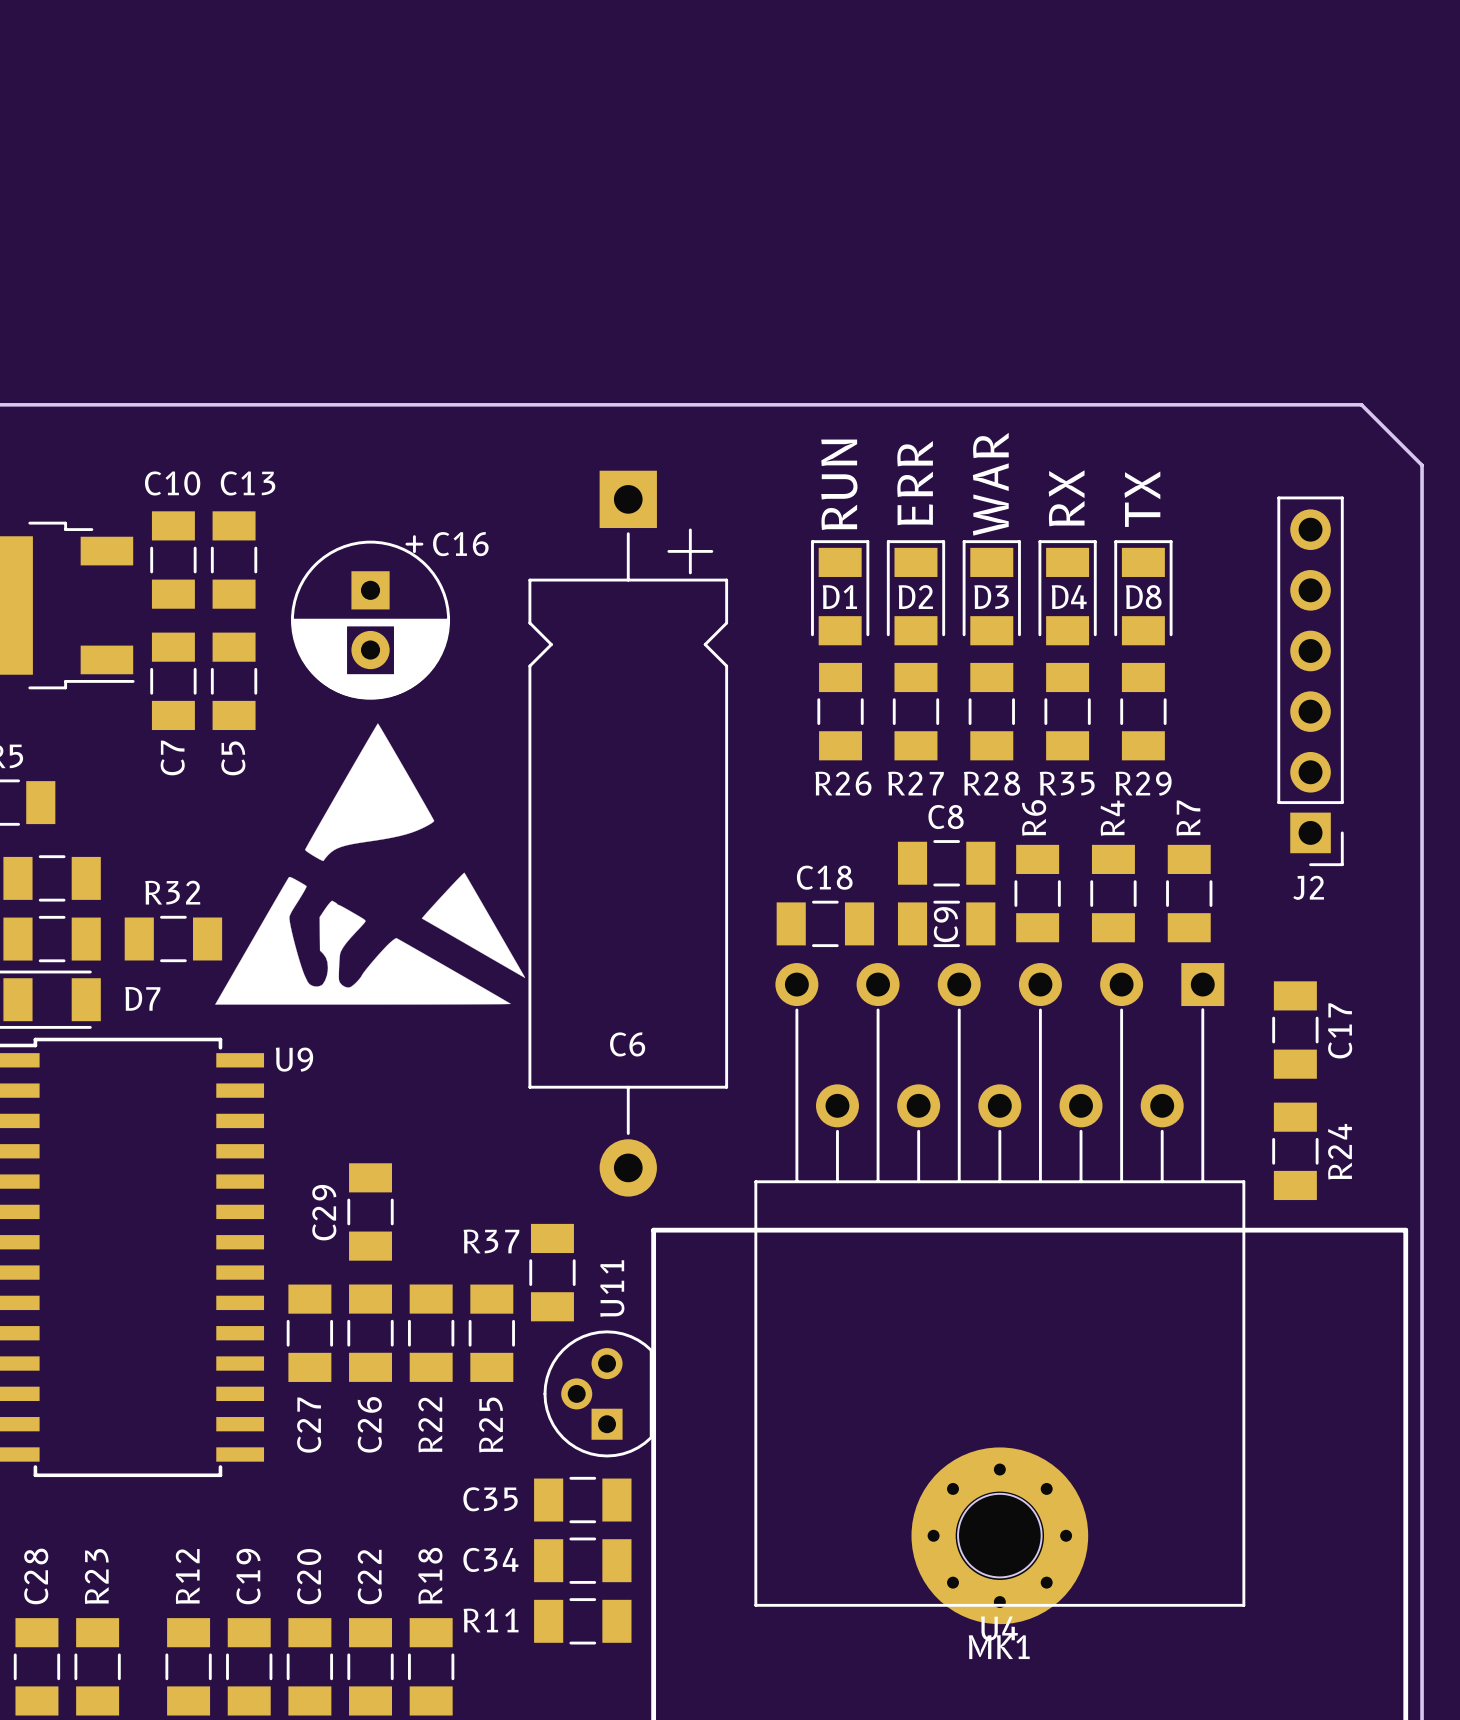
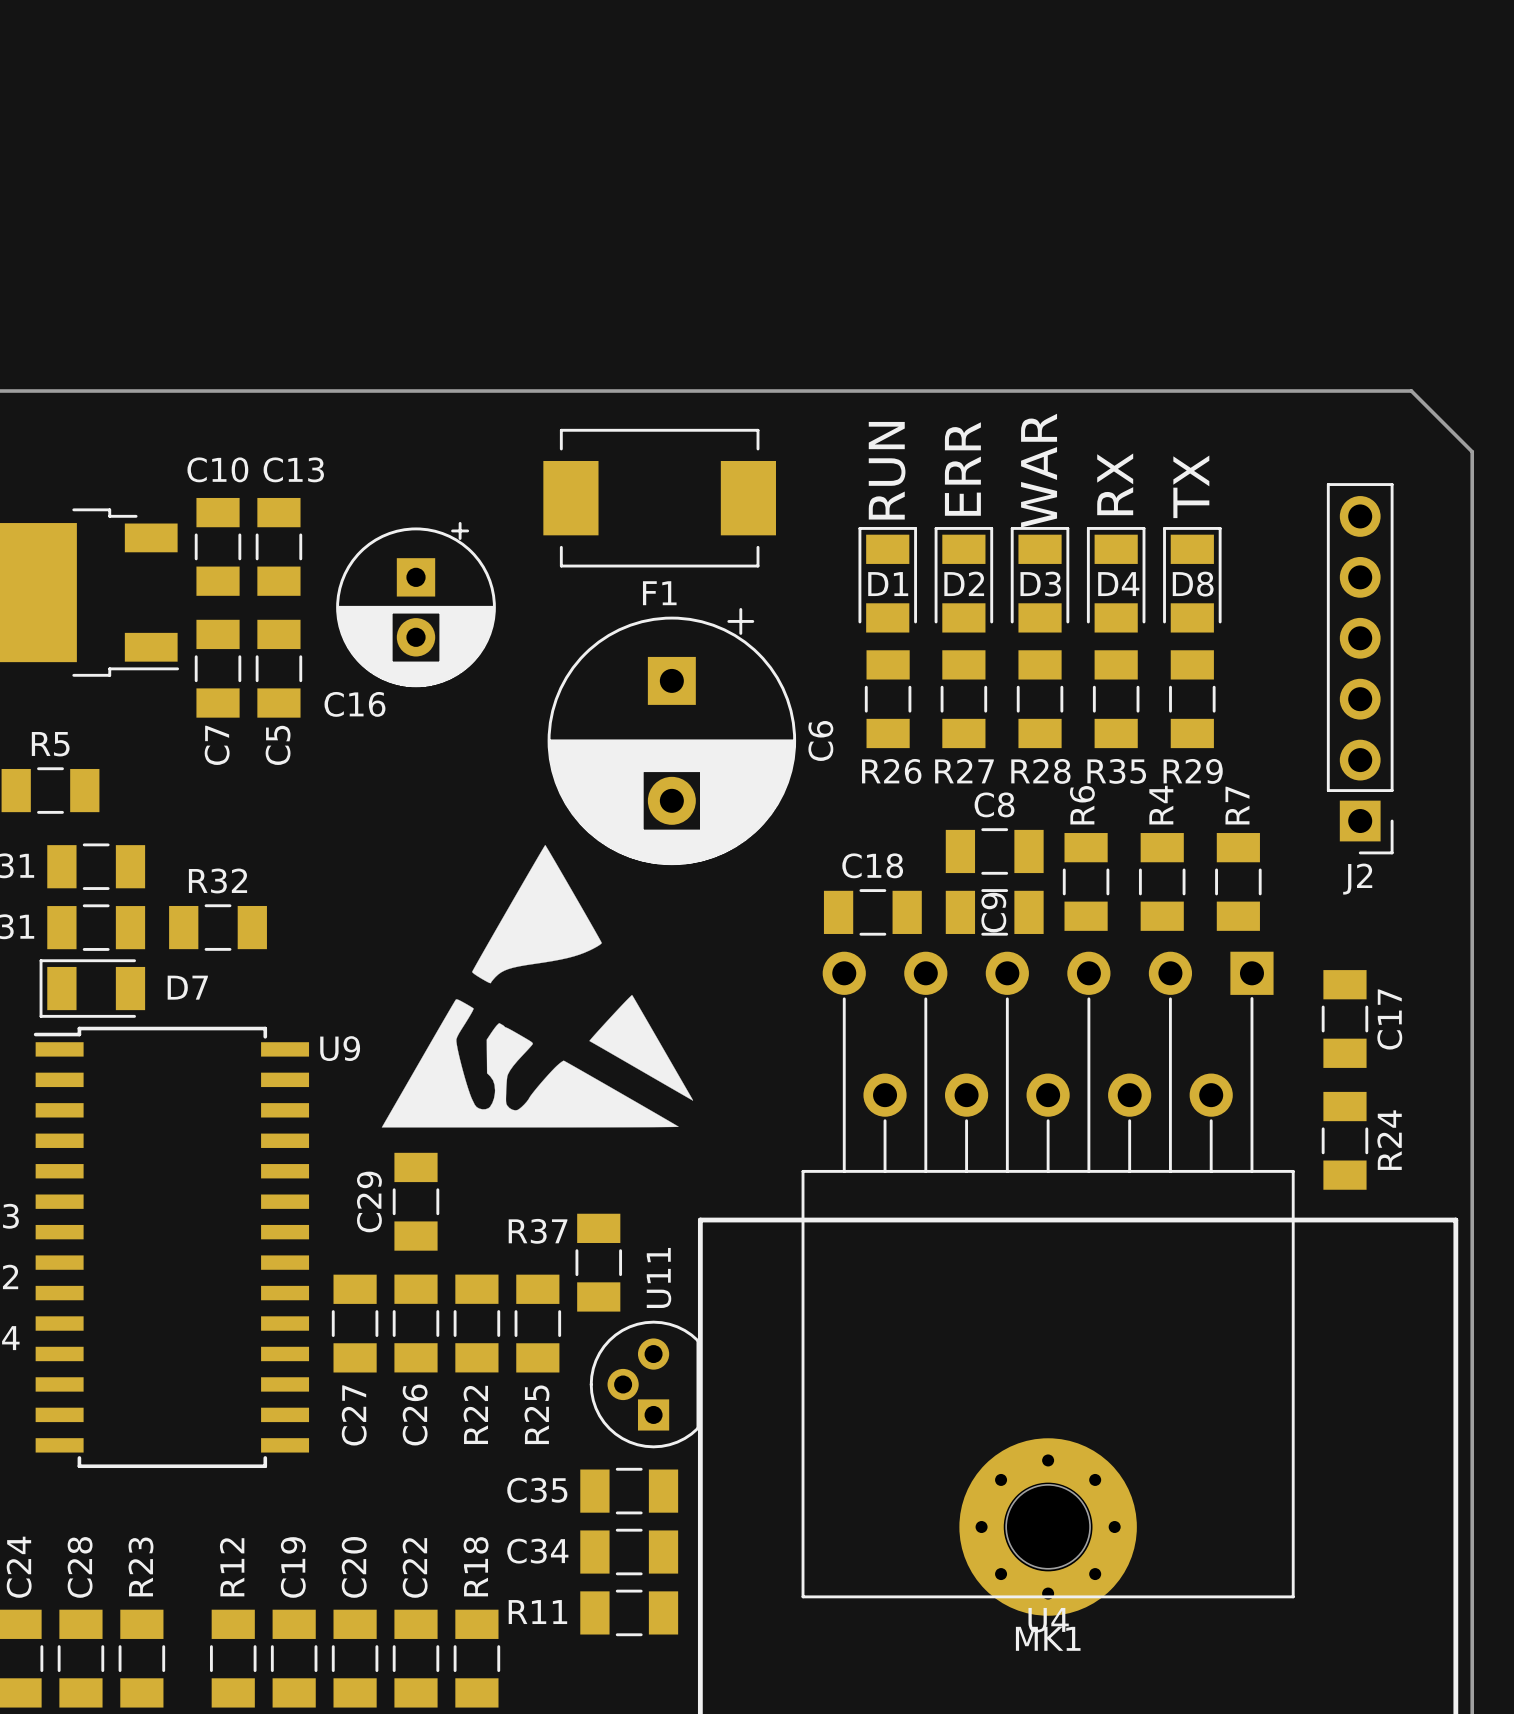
C6 footprint: [528, 470, 729, 1197] -> [547, 608, 797, 866]
F1: none -> (659, 498)
C16 name position: C16 (460, 544) -> C16 (354, 704)
drawing position: (370, 863) -> (537, 986)
C6 name position: C6 (627, 1044) -> C6 (820, 740)

